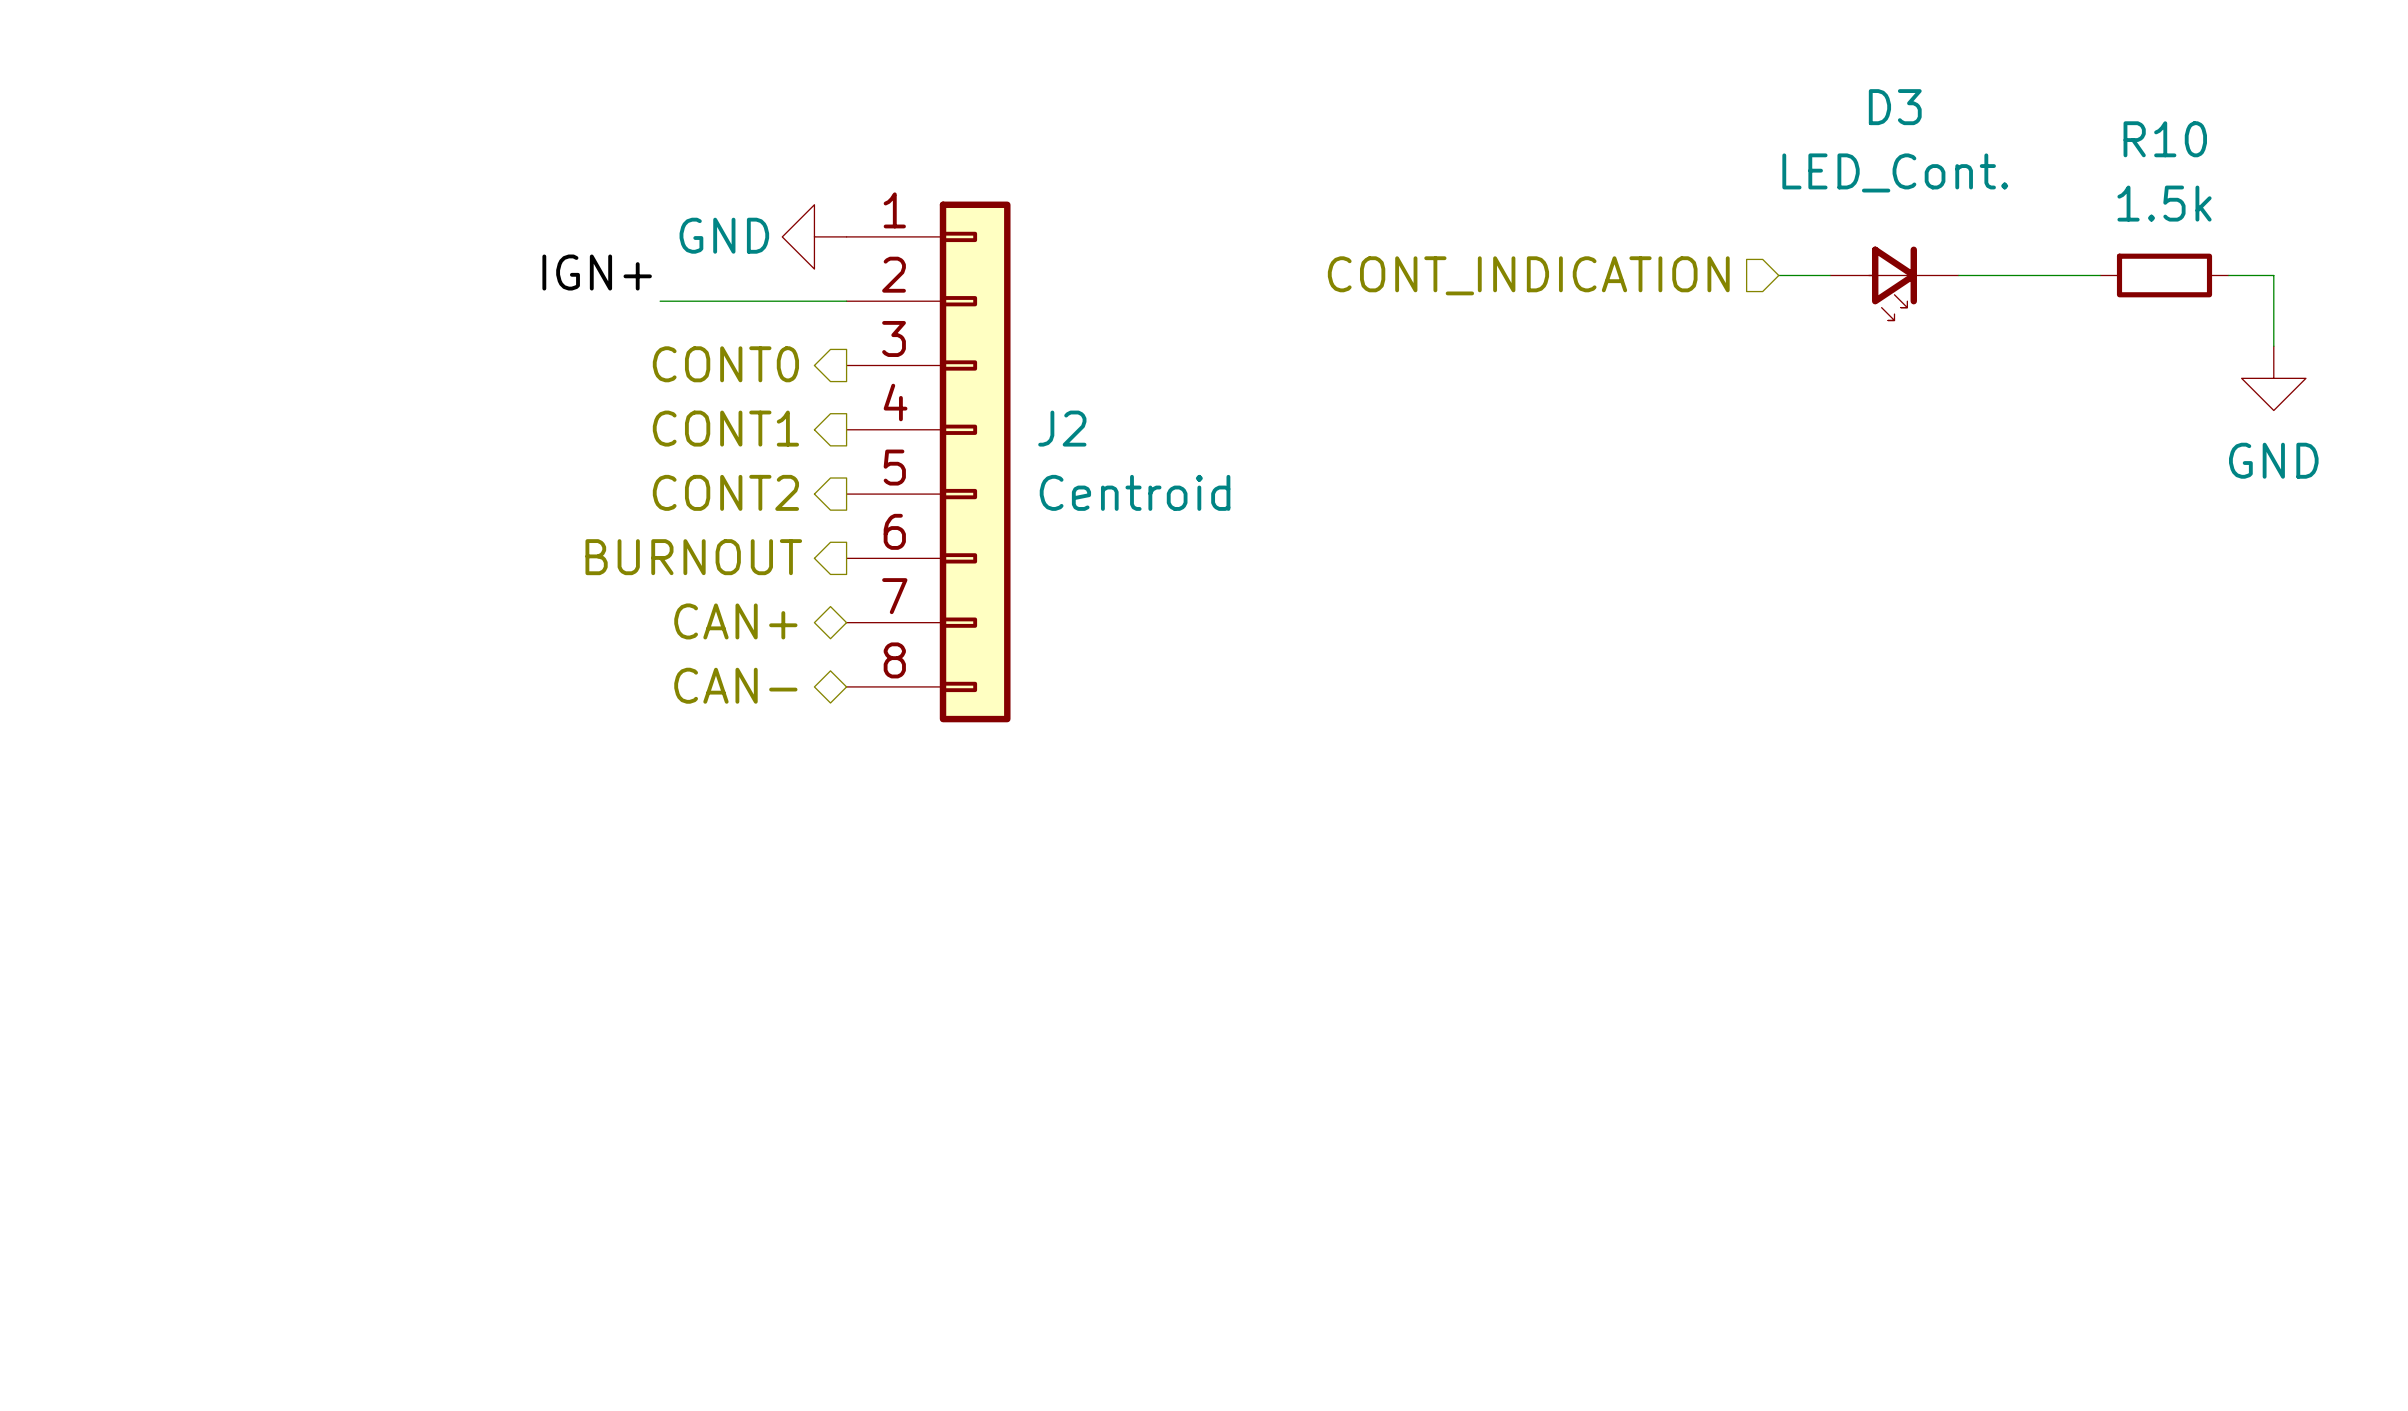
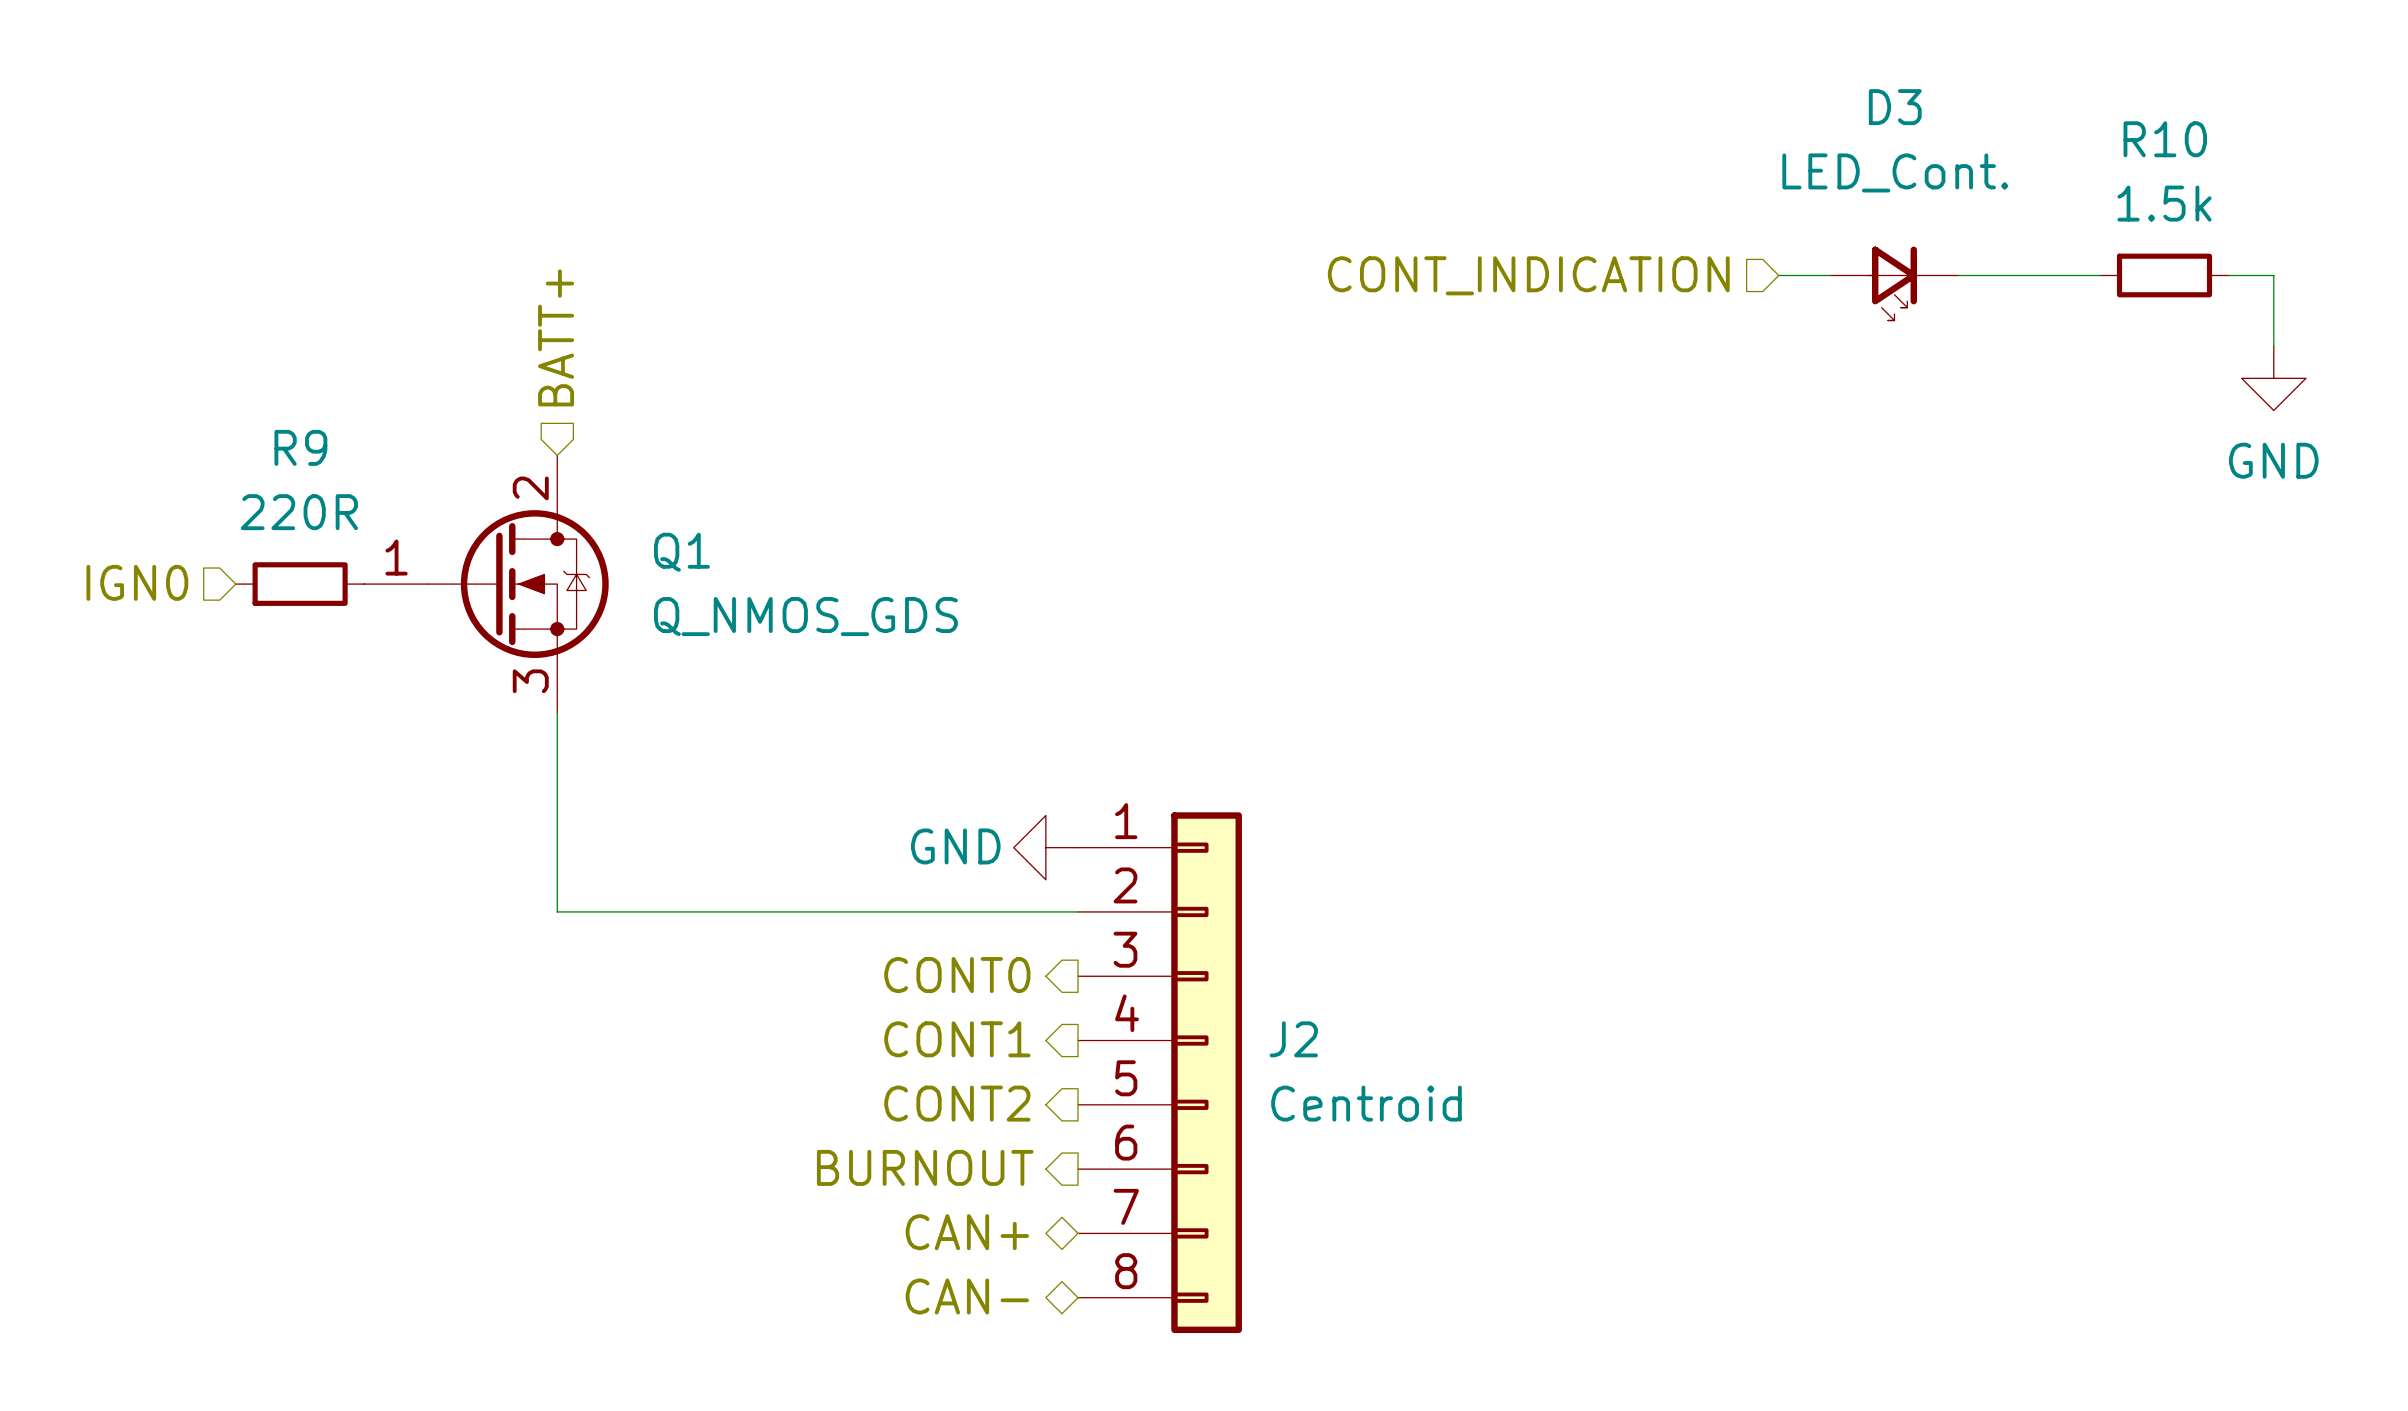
power symbol: GND (814, 236) -> none
label: IGN+ (597, 272) -> none
wire: (660, 301) (846, 301) -> none
hierarchical label: none -> BATT+ (556, 337)
hierarchical label: CONT0 (725, 364) -> none
hierarchical label: CONT1 (725, 428) -> none
J2 position: (928, 461) -> (1159, 1072)
hierarchical label: CONT2 (725, 492) -> none
hierarchical label: BURNOUT (693, 557) -> none
hierarchical label: none -> IGN0 (137, 582)
R9: none -> 220R (300, 584)
Q1: none -> Q_NMOS_GDS (486, 584)
hierarchical label: CAN+ (735, 621) -> none
hierarchical label: CAN- (735, 685) -> none
wire: none -> (557, 712) (557, 911) (1078, 911)
power symbol: none -> GND (1045, 847)
hierarchical label: none -> CONT0 (957, 975)
hierarchical label: none -> CONT1 (957, 1039)
hierarchical label: none -> CONT2 (957, 1103)
hierarchical label: none -> BURNOUT (925, 1167)
hierarchical label: none -> CAN+ (967, 1232)
hierarchical label: none -> CAN- (967, 1296)

